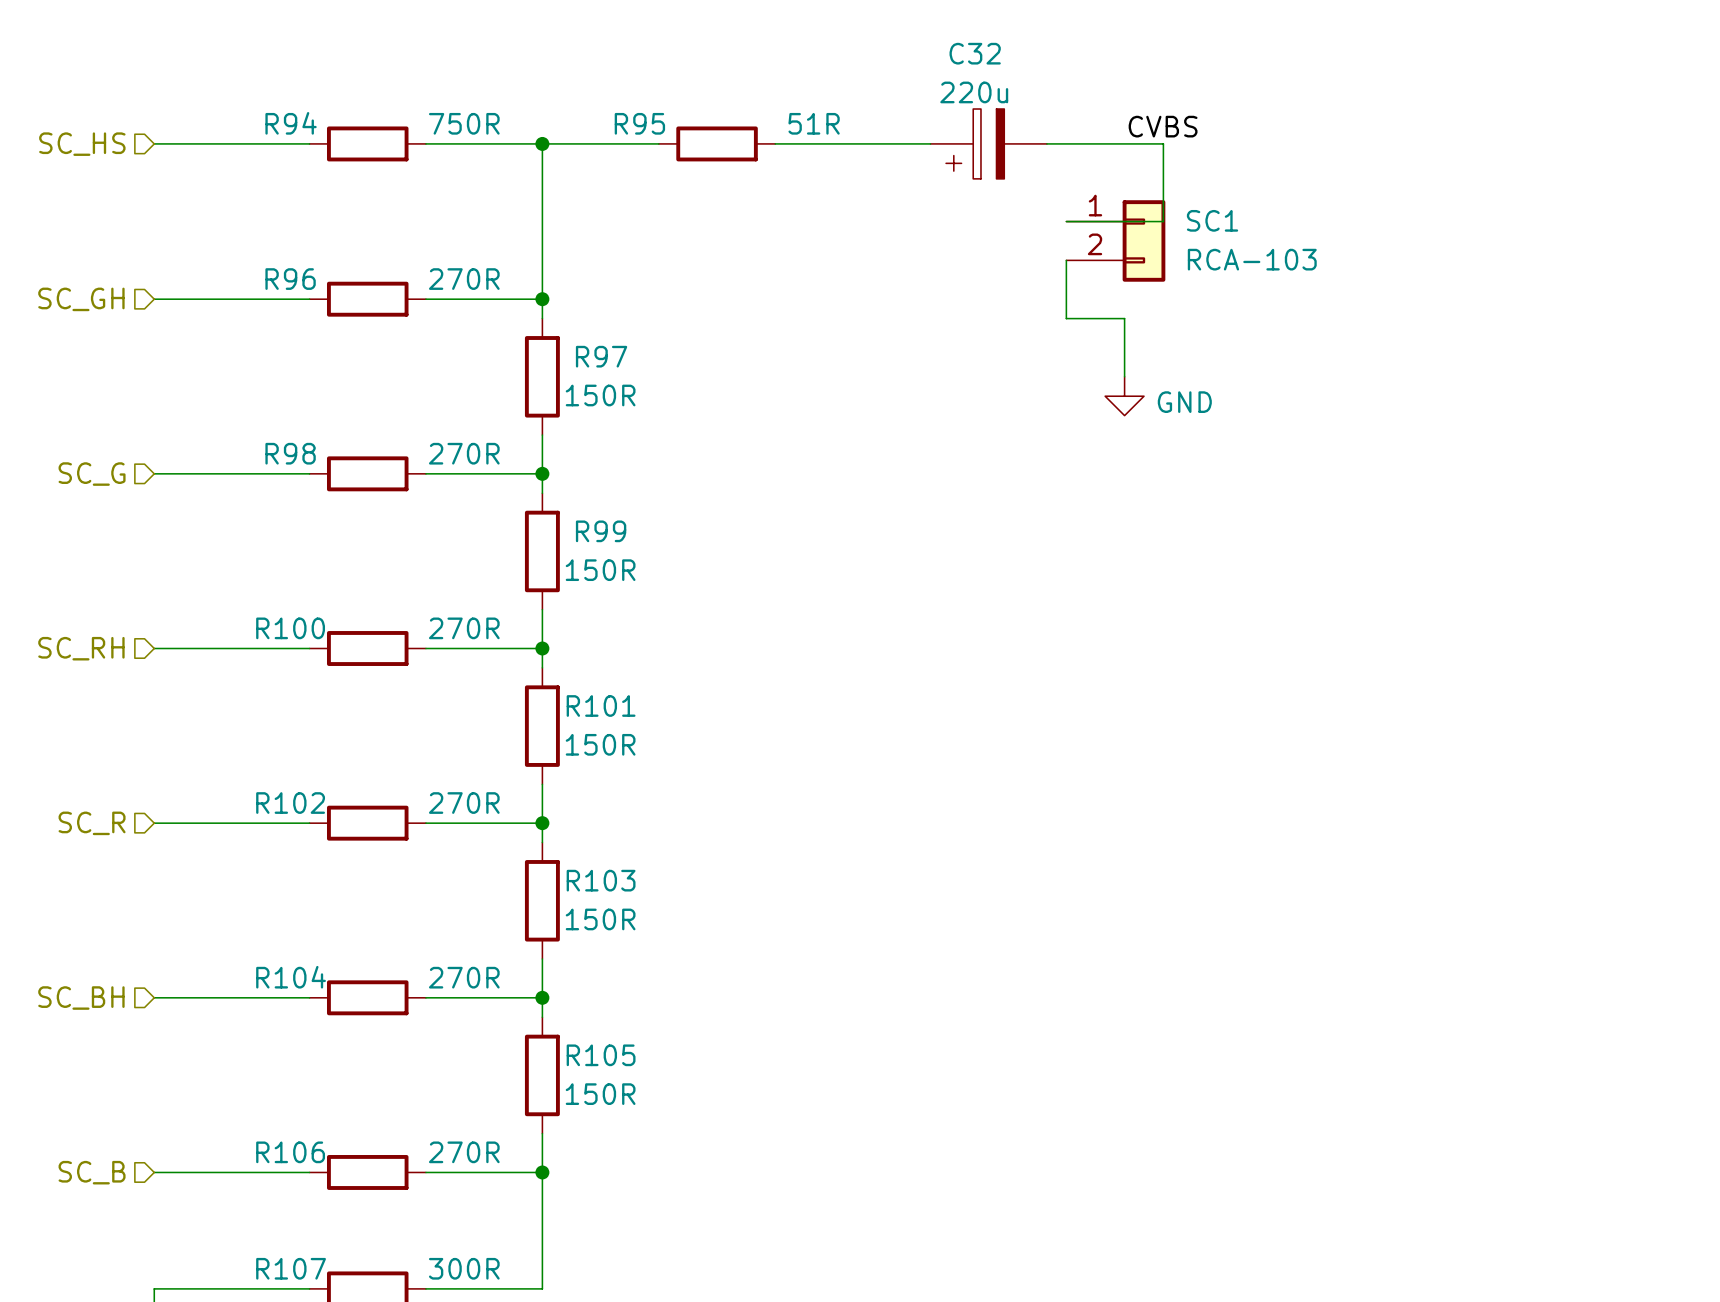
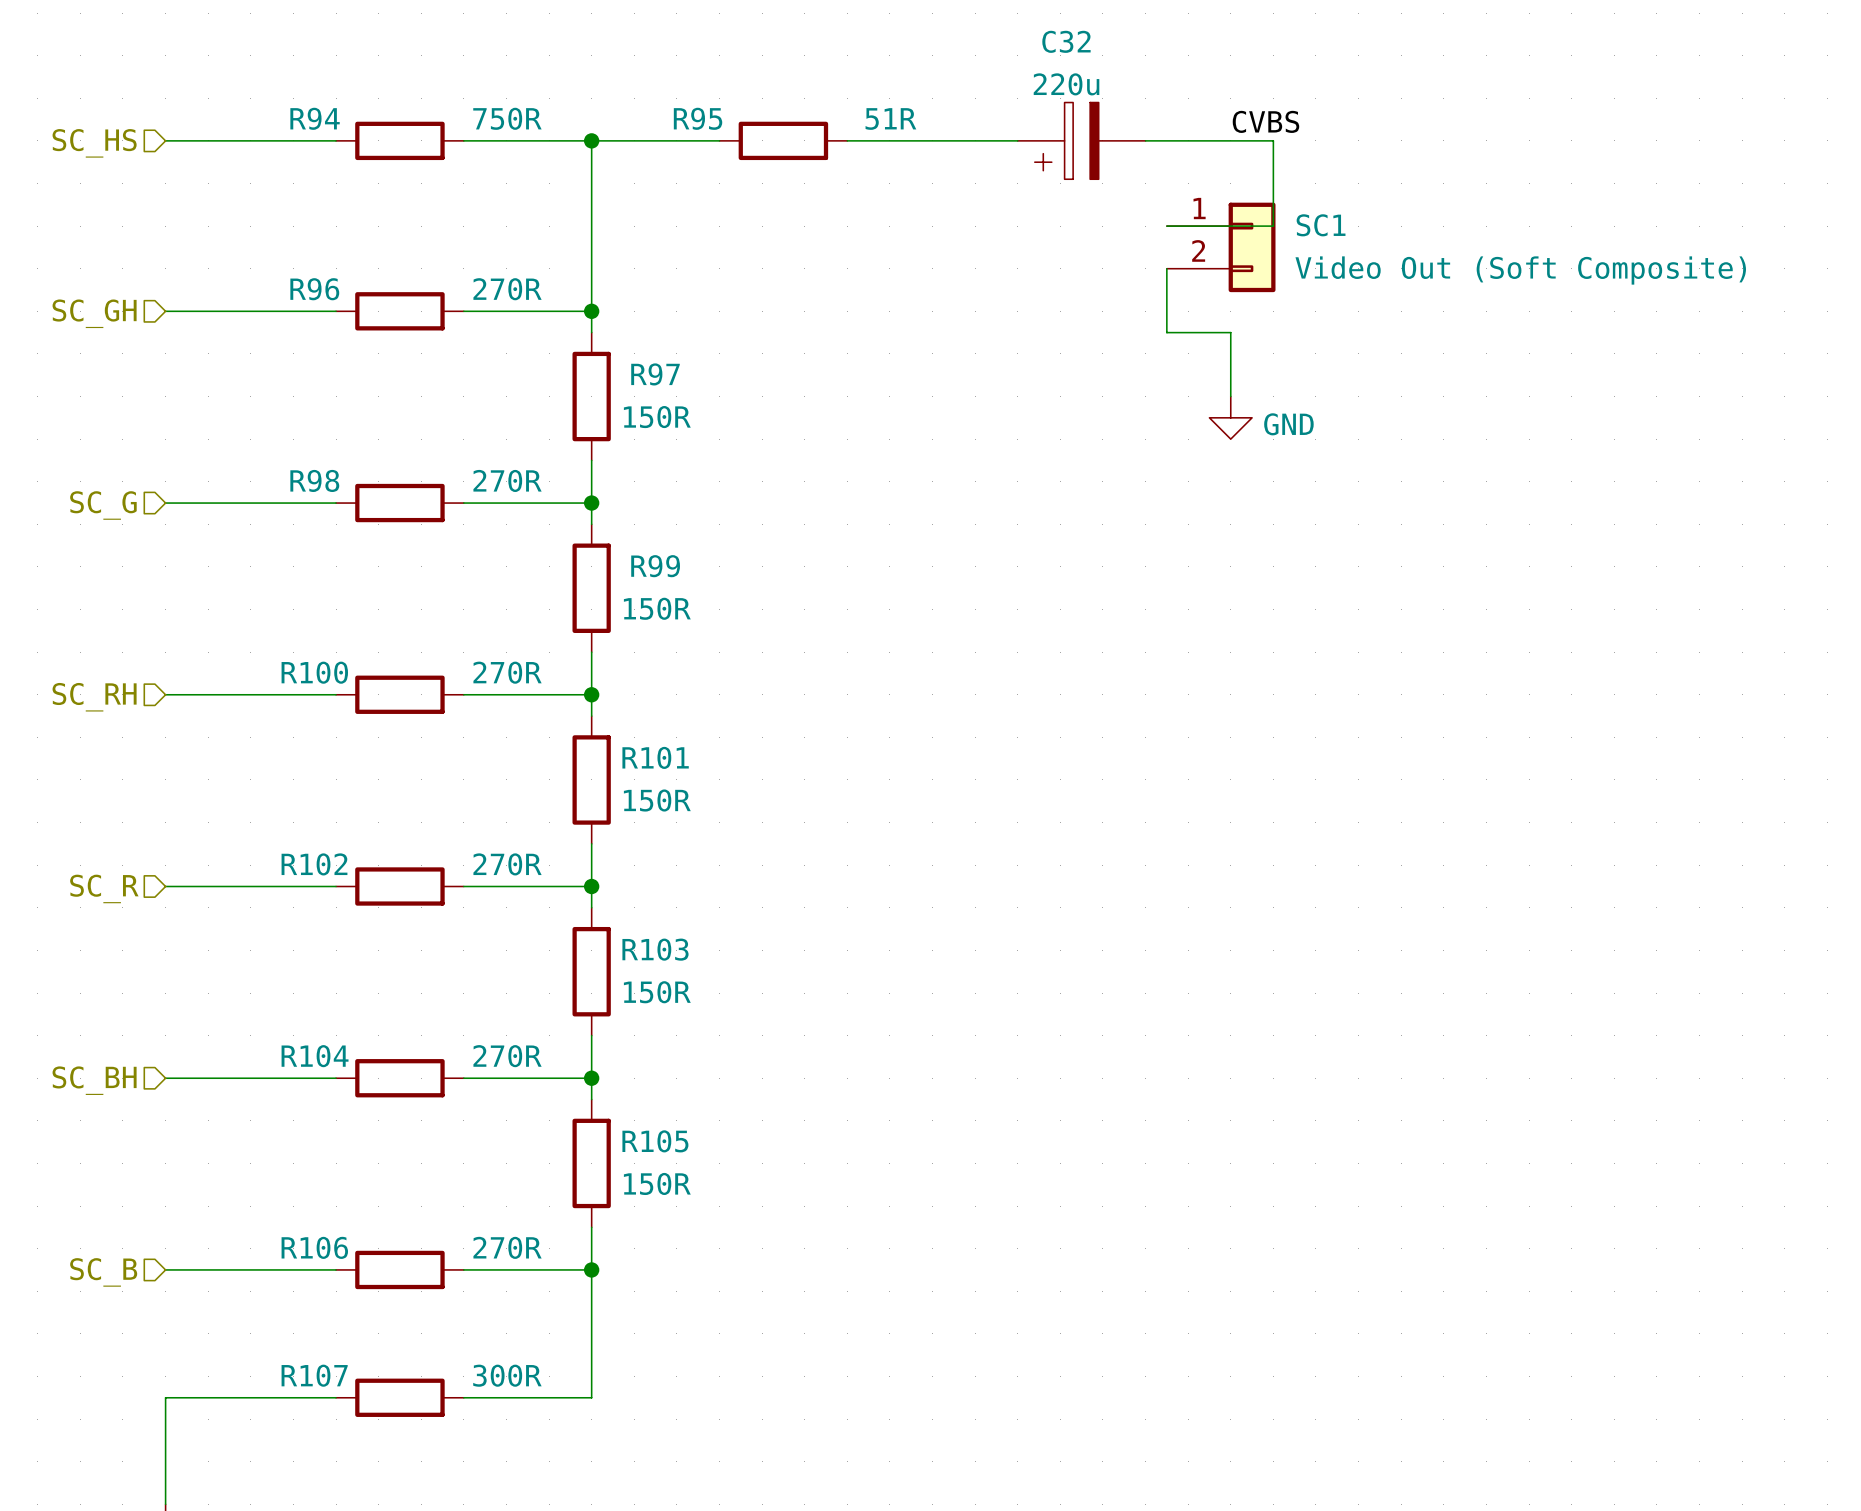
SC1 value: RCA-103 (1252, 259) -> Video Out (Soft Composite) (1520, 270)

